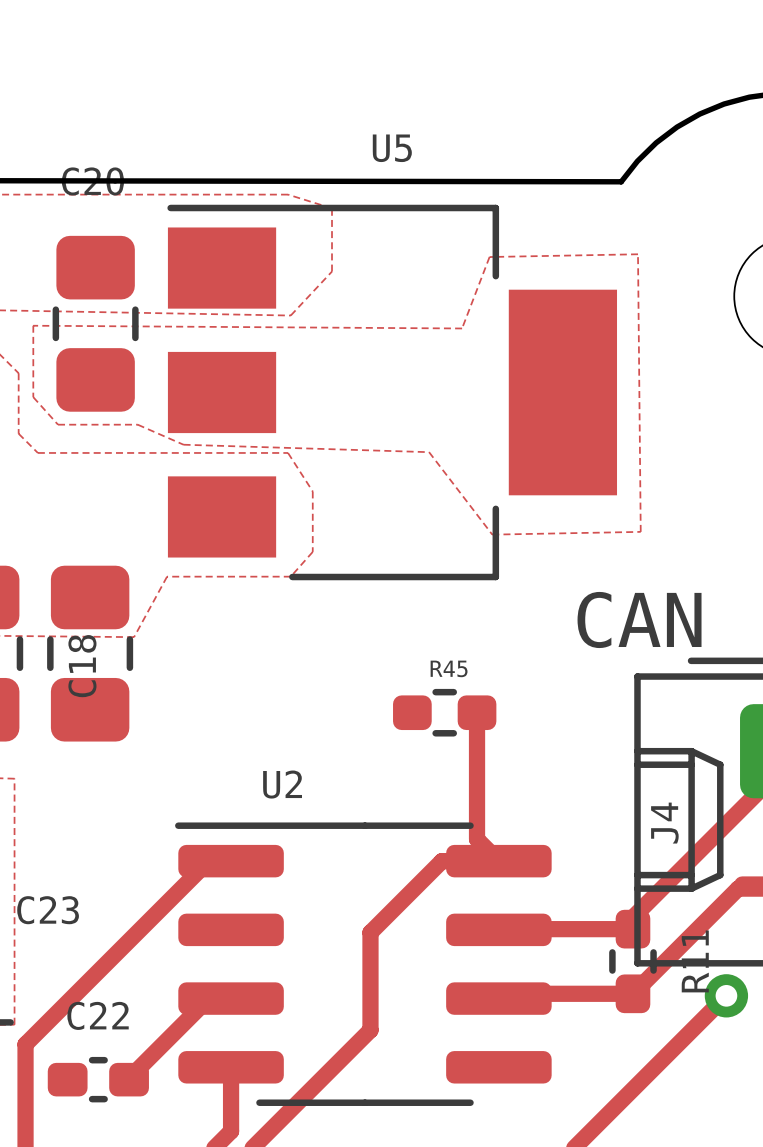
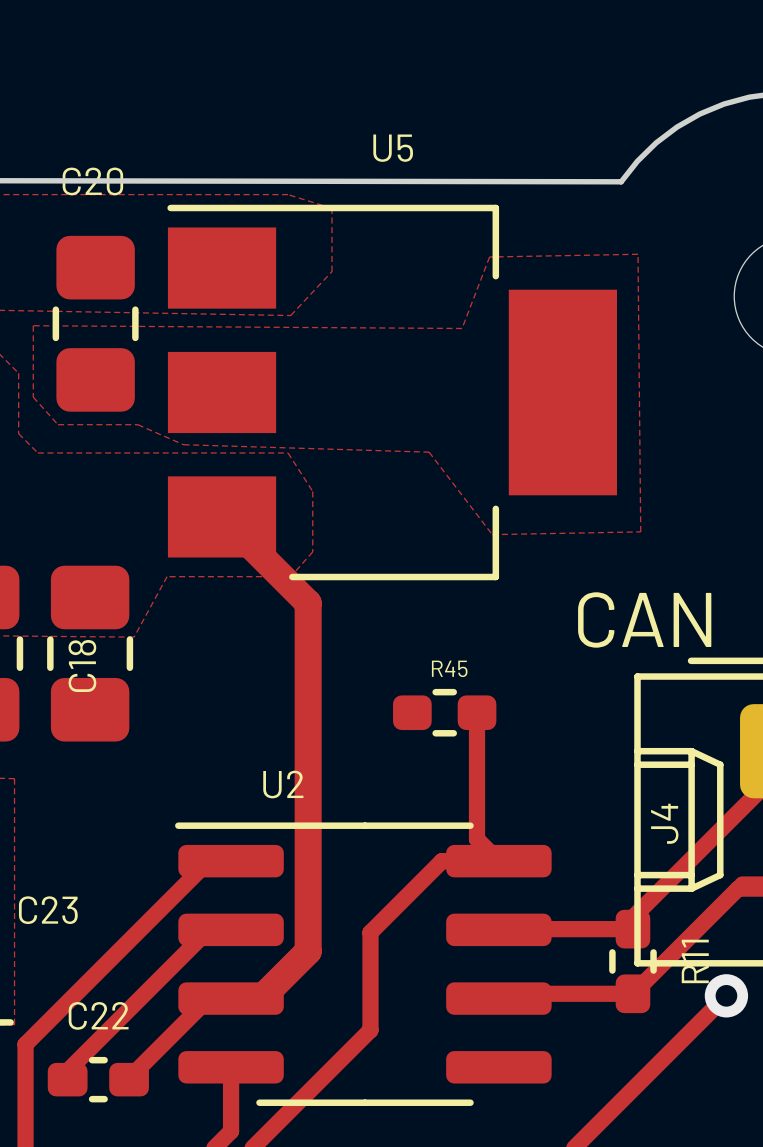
track: none -> (222, 516) (308, 603) (308, 951) (261, 998) (231, 998)
track: none -> (231, 929) (208, 929) (67, 1070) (67, 1079)

